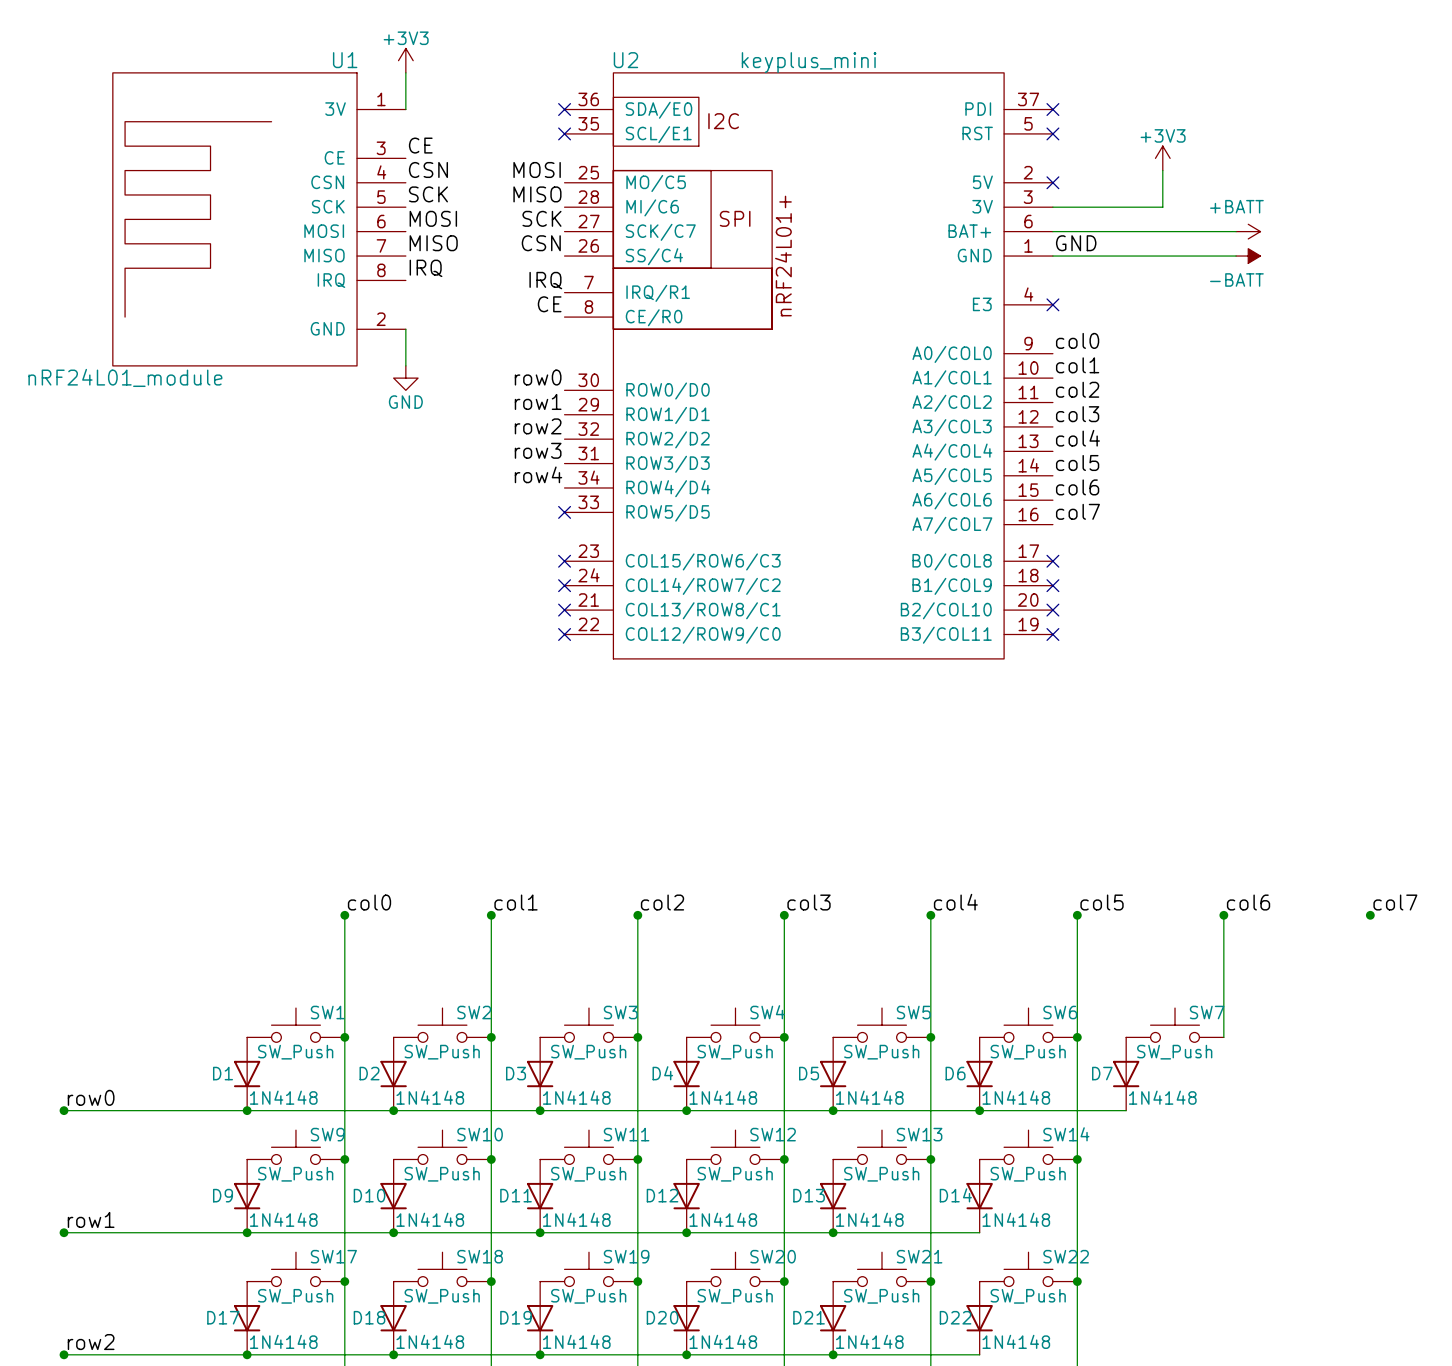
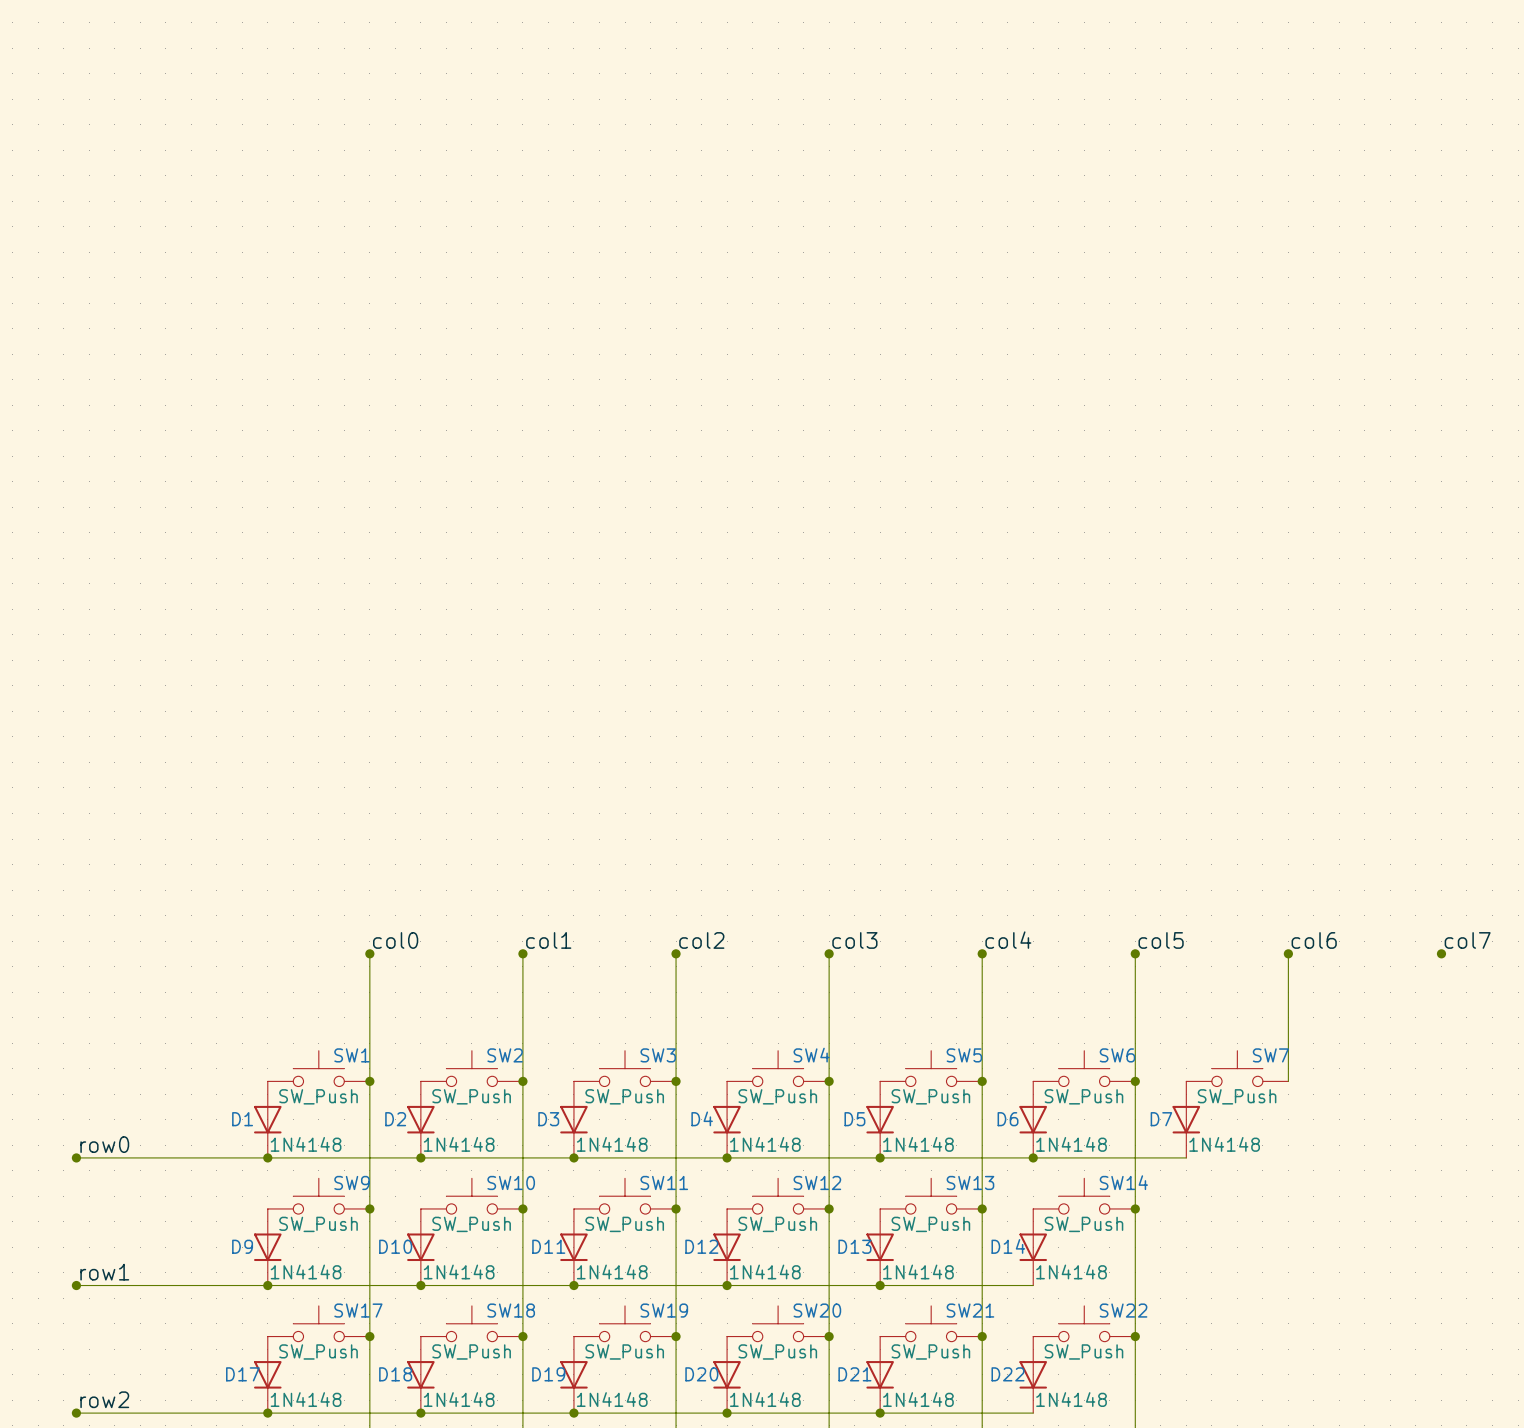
power symbol: +3V3 (405, 60) -> none
wire: (405, 72) (405, 109) -> none
no-connect mark: (564, 109) -> none
no-connect mark: (1052, 109) -> none
no-connect mark: (564, 133) -> none
no-connect mark: (1052, 133) -> none
label: CE (420, 145) -> none
power symbol: +3V3 (1162, 158) -> none
label: CSN (428, 169) -> none
label: MOSI (537, 169) -> none
wire: (1162, 170) (1162, 207) (1052, 207) -> none
no-connect mark: (1052, 182) -> none
label: SCK (428, 194) -> none
label: MISO (537, 194) -> none
label: MOSI (433, 218) -> none
label: SCK (541, 218) -> none
U1: nRF24L01_module (259, 219) -> none
wire: (1052, 231) (1236, 231) -> none
power symbol: +BATT (1248, 231) -> none
label: MISO (433, 243) -> none
label: CSN (541, 243) -> none
label: GND (1076, 243) -> none
wire: (1052, 256) (1236, 256) -> none
power symbol: -BATT (1248, 256) -> none
label: IRQ (426, 268) -> none
label: IRQ (545, 280) -> none
label: CE (549, 304) -> none
no-connect mark: (1052, 304) -> none
wire: (405, 329) (405, 365) -> none
label: col0 (1077, 340) -> none
U2: keyplus_mini (808, 365) -> none
label: col1 (1077, 365) -> none
label: row0 (538, 377) -> none
power symbol: GND (405, 378) -> none
label: col2 (1077, 389) -> none
label: row1 (538, 401) -> none
label: col3 (1077, 414) -> none
label: row2 (538, 426) -> none
label: col4 (1077, 438) -> none
label: row3 (538, 450) -> none
label: col5 (1077, 463) -> none
label: row4 (538, 474) -> none
label: col6 (1077, 487) -> none
label: col7 (1077, 511) -> none
no-connect mark: (564, 512) -> none
no-connect mark: (564, 561) -> none
no-connect mark: (1052, 561) -> none
no-connect mark: (564, 585) -> none
no-connect mark: (1052, 585) -> none
no-connect mark: (564, 610) -> none
no-connect mark: (1052, 610) -> none
no-connect mark: (564, 634) -> none
no-connect mark: (1052, 634) -> none

